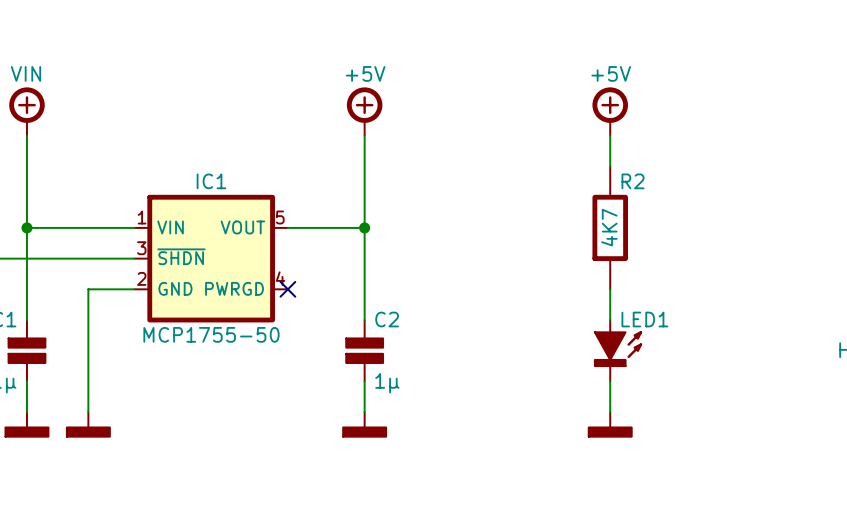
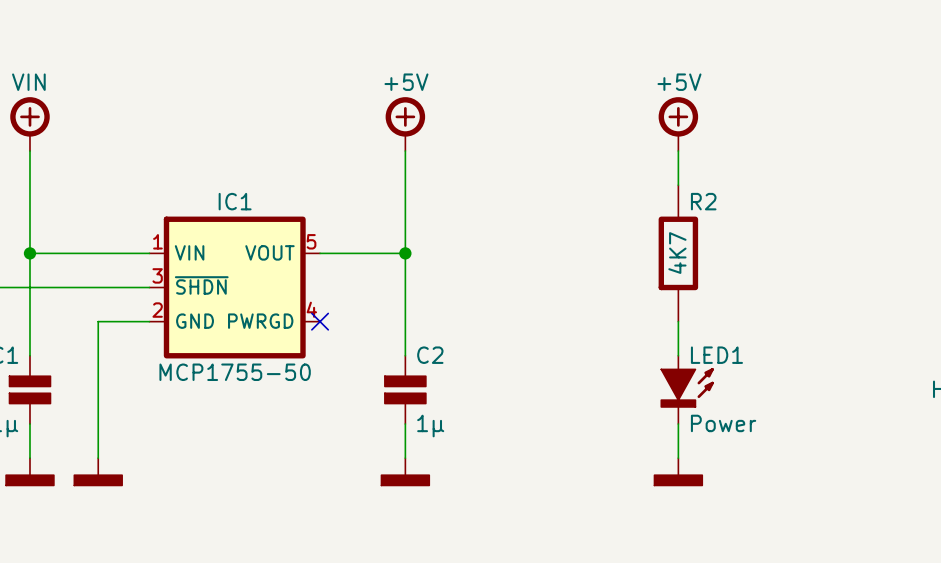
LED1 value: none -> Power (723, 423)

